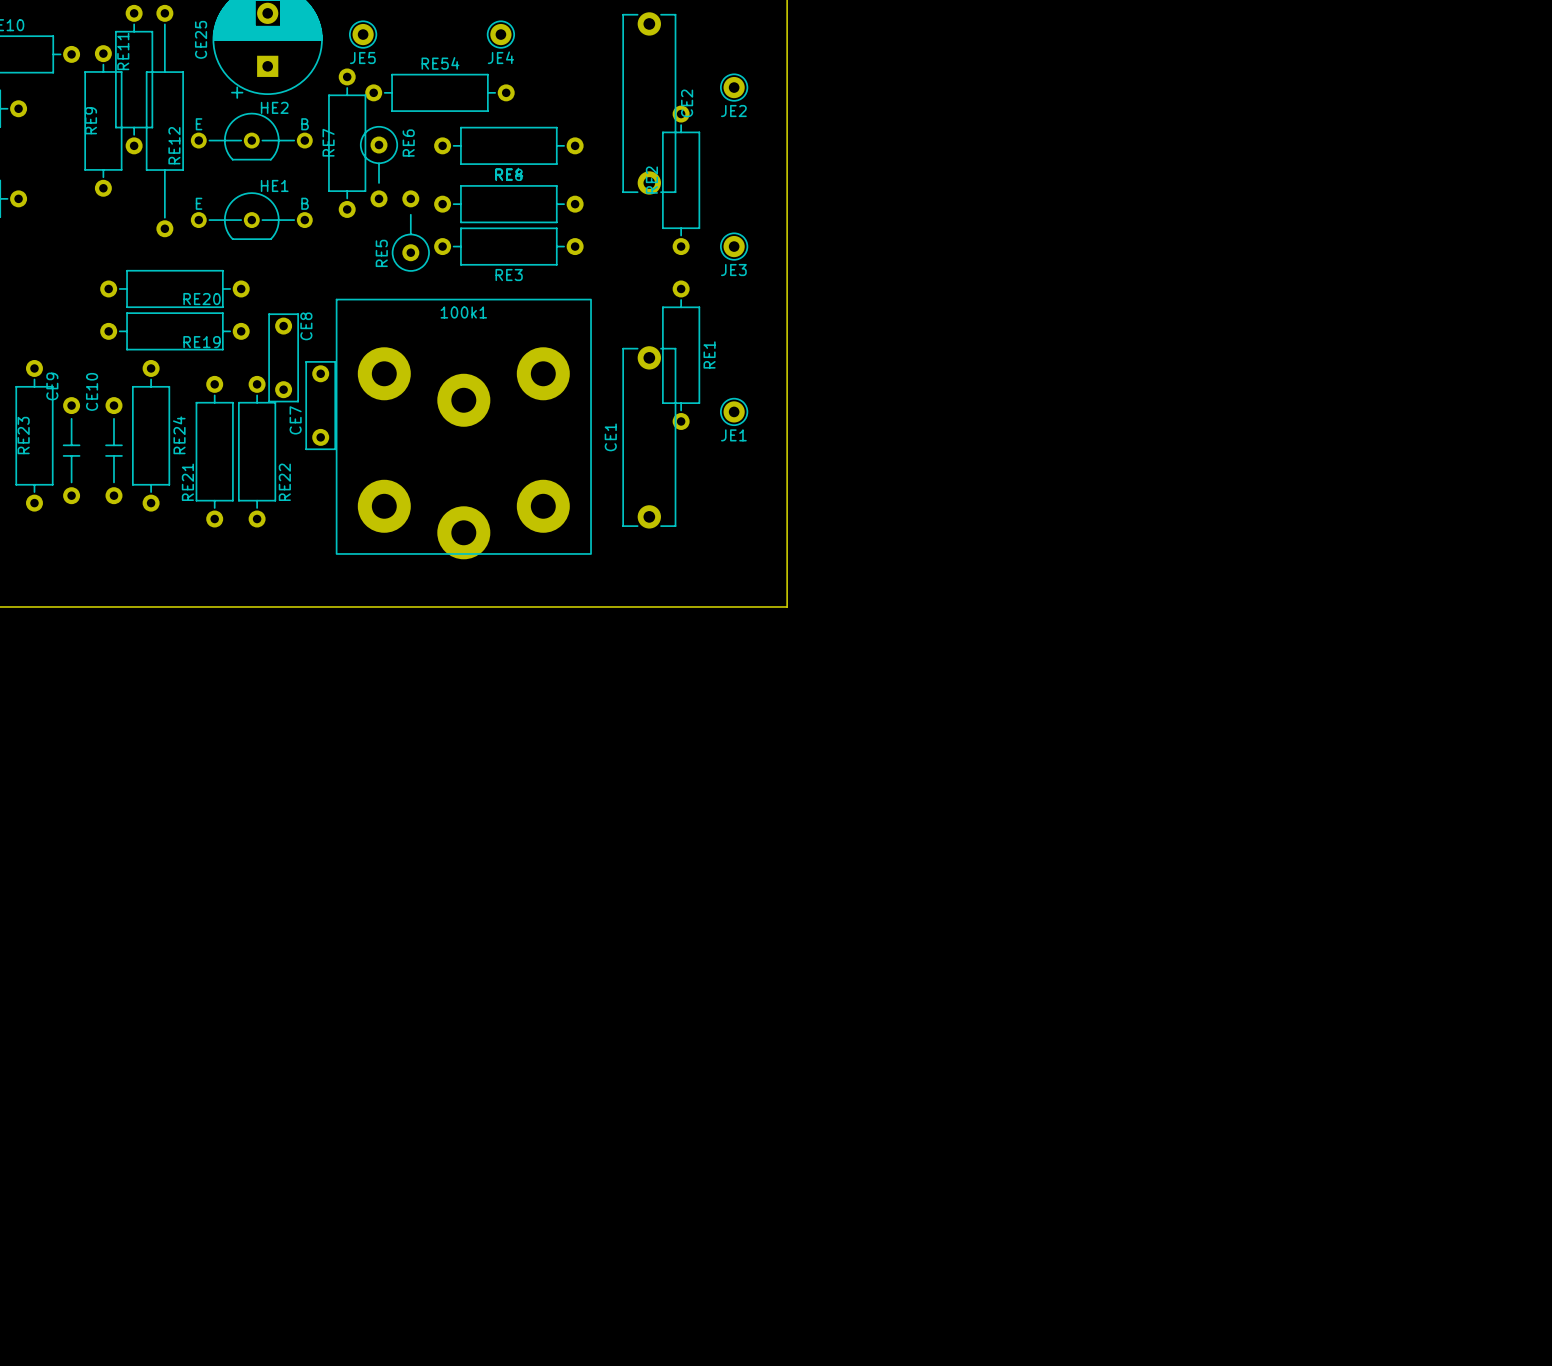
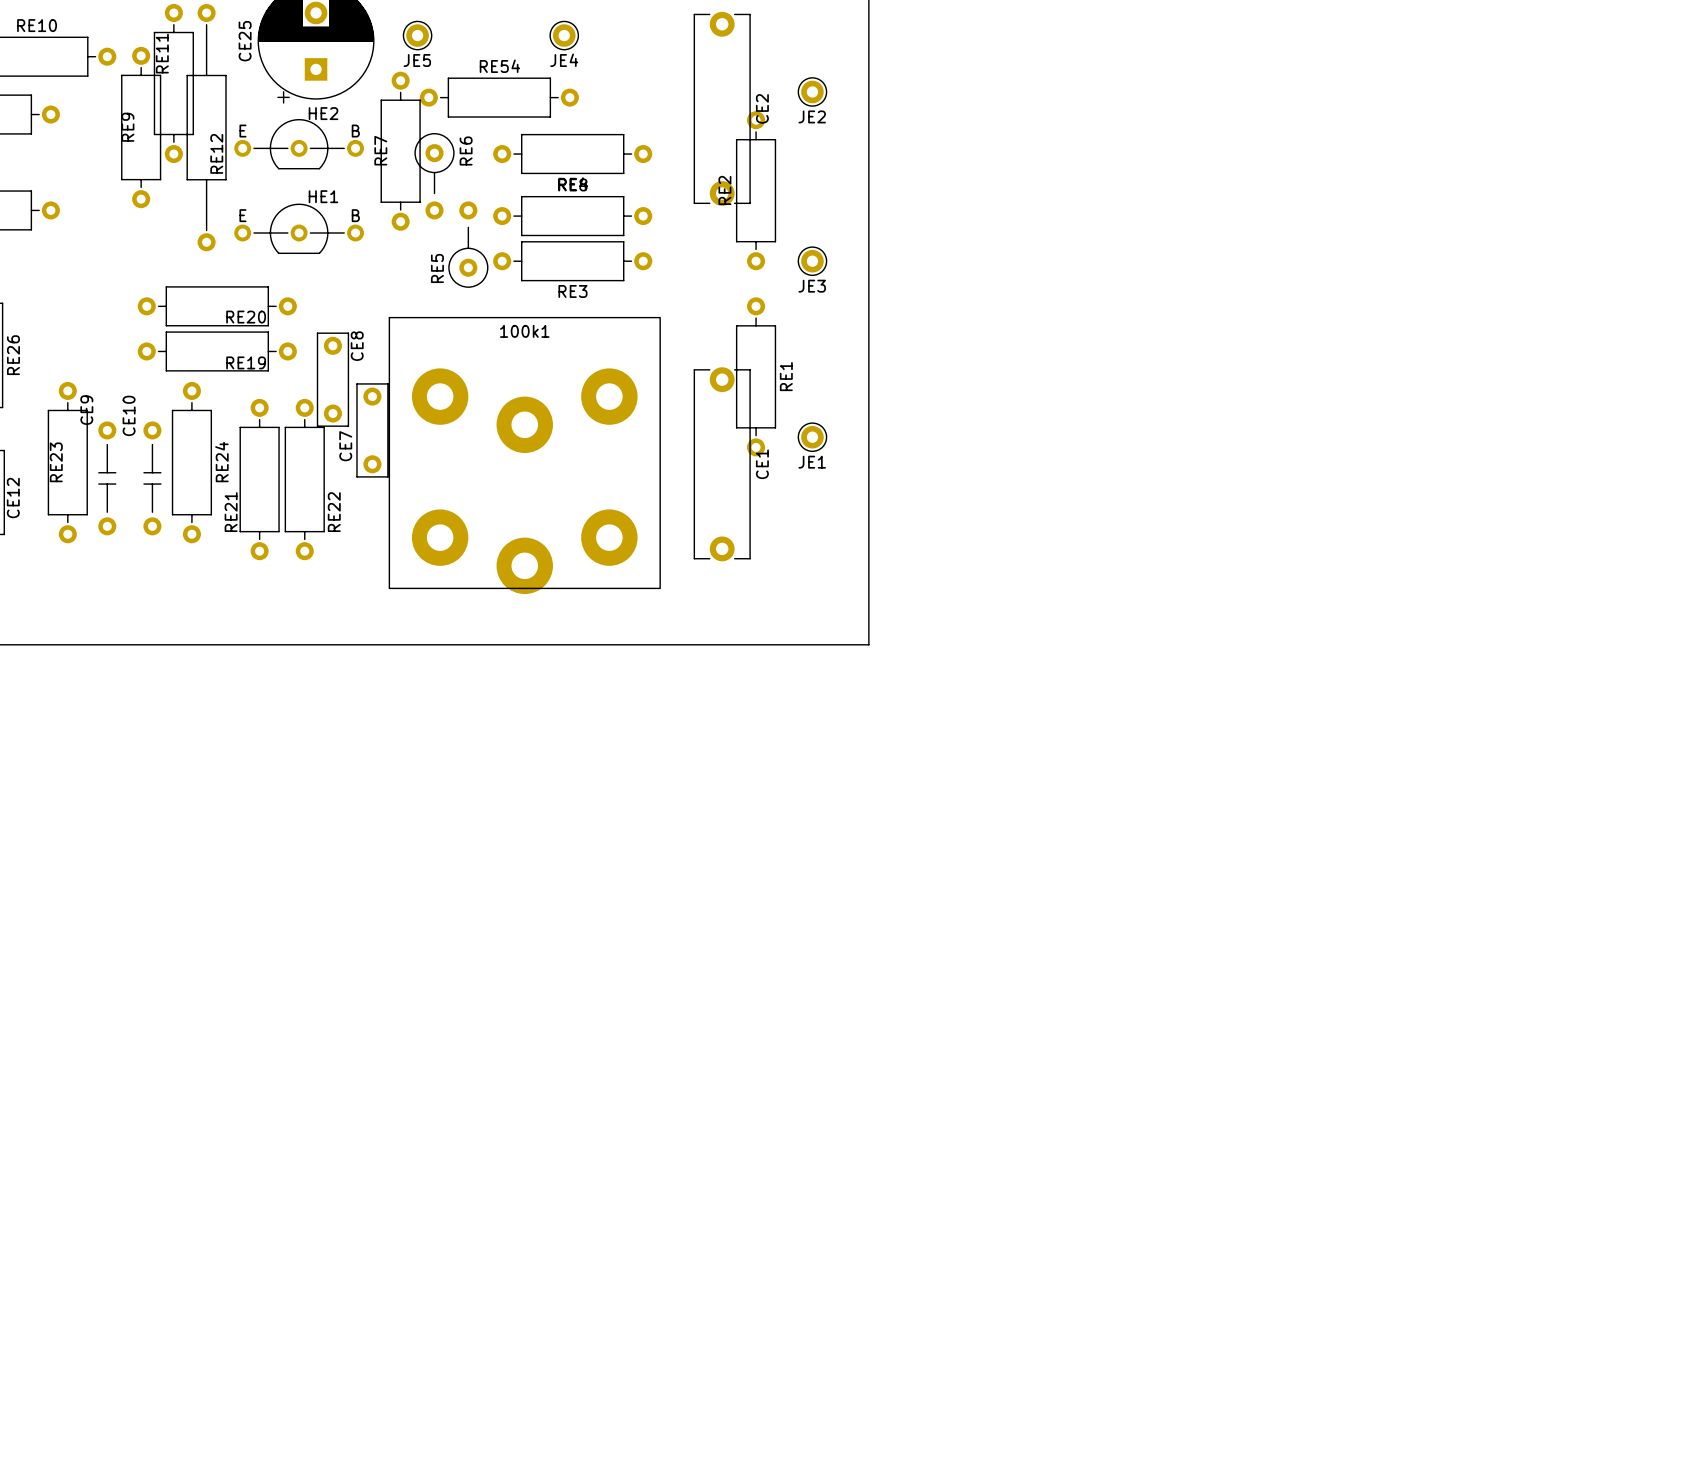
CE1 name position: CE1 (610, 437) -> CE1 (762, 464)

